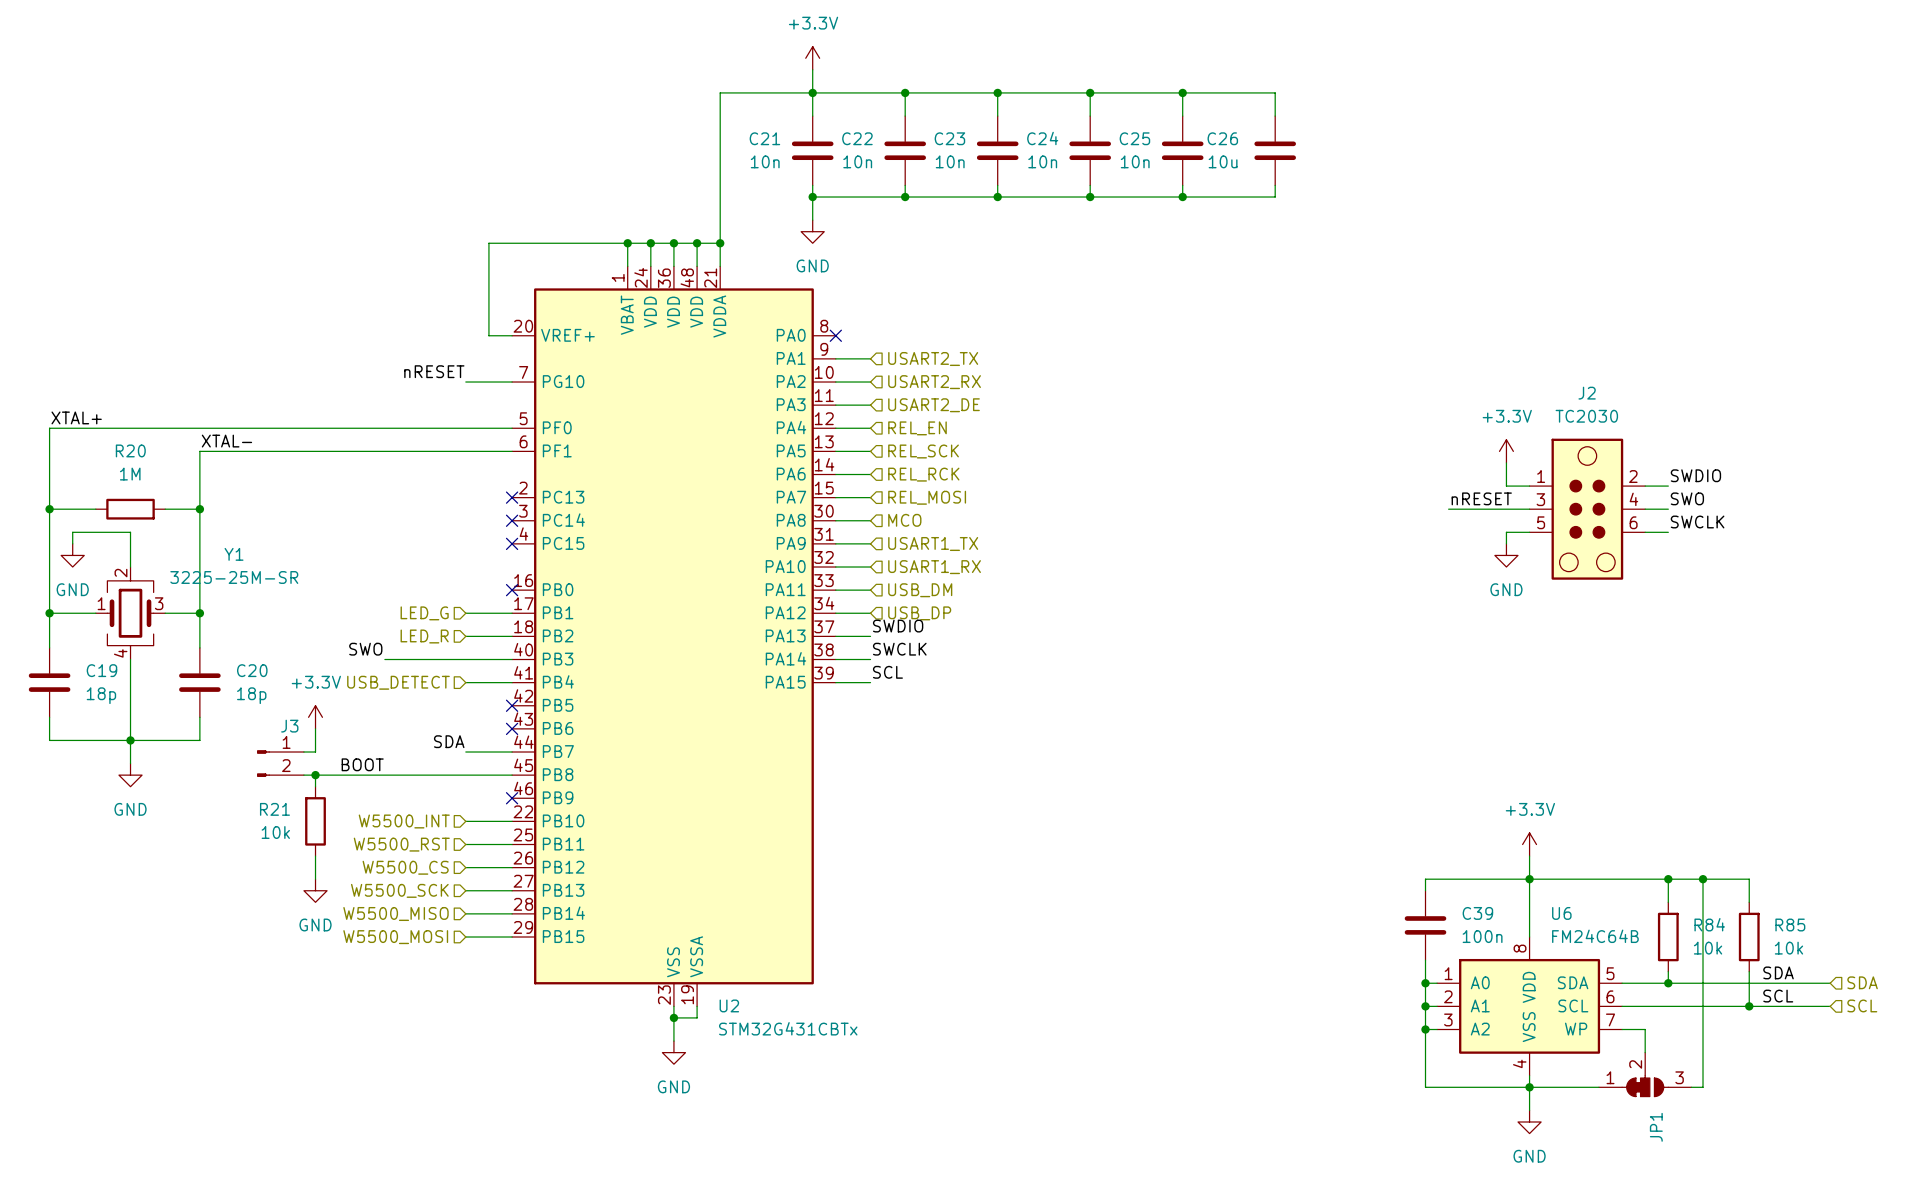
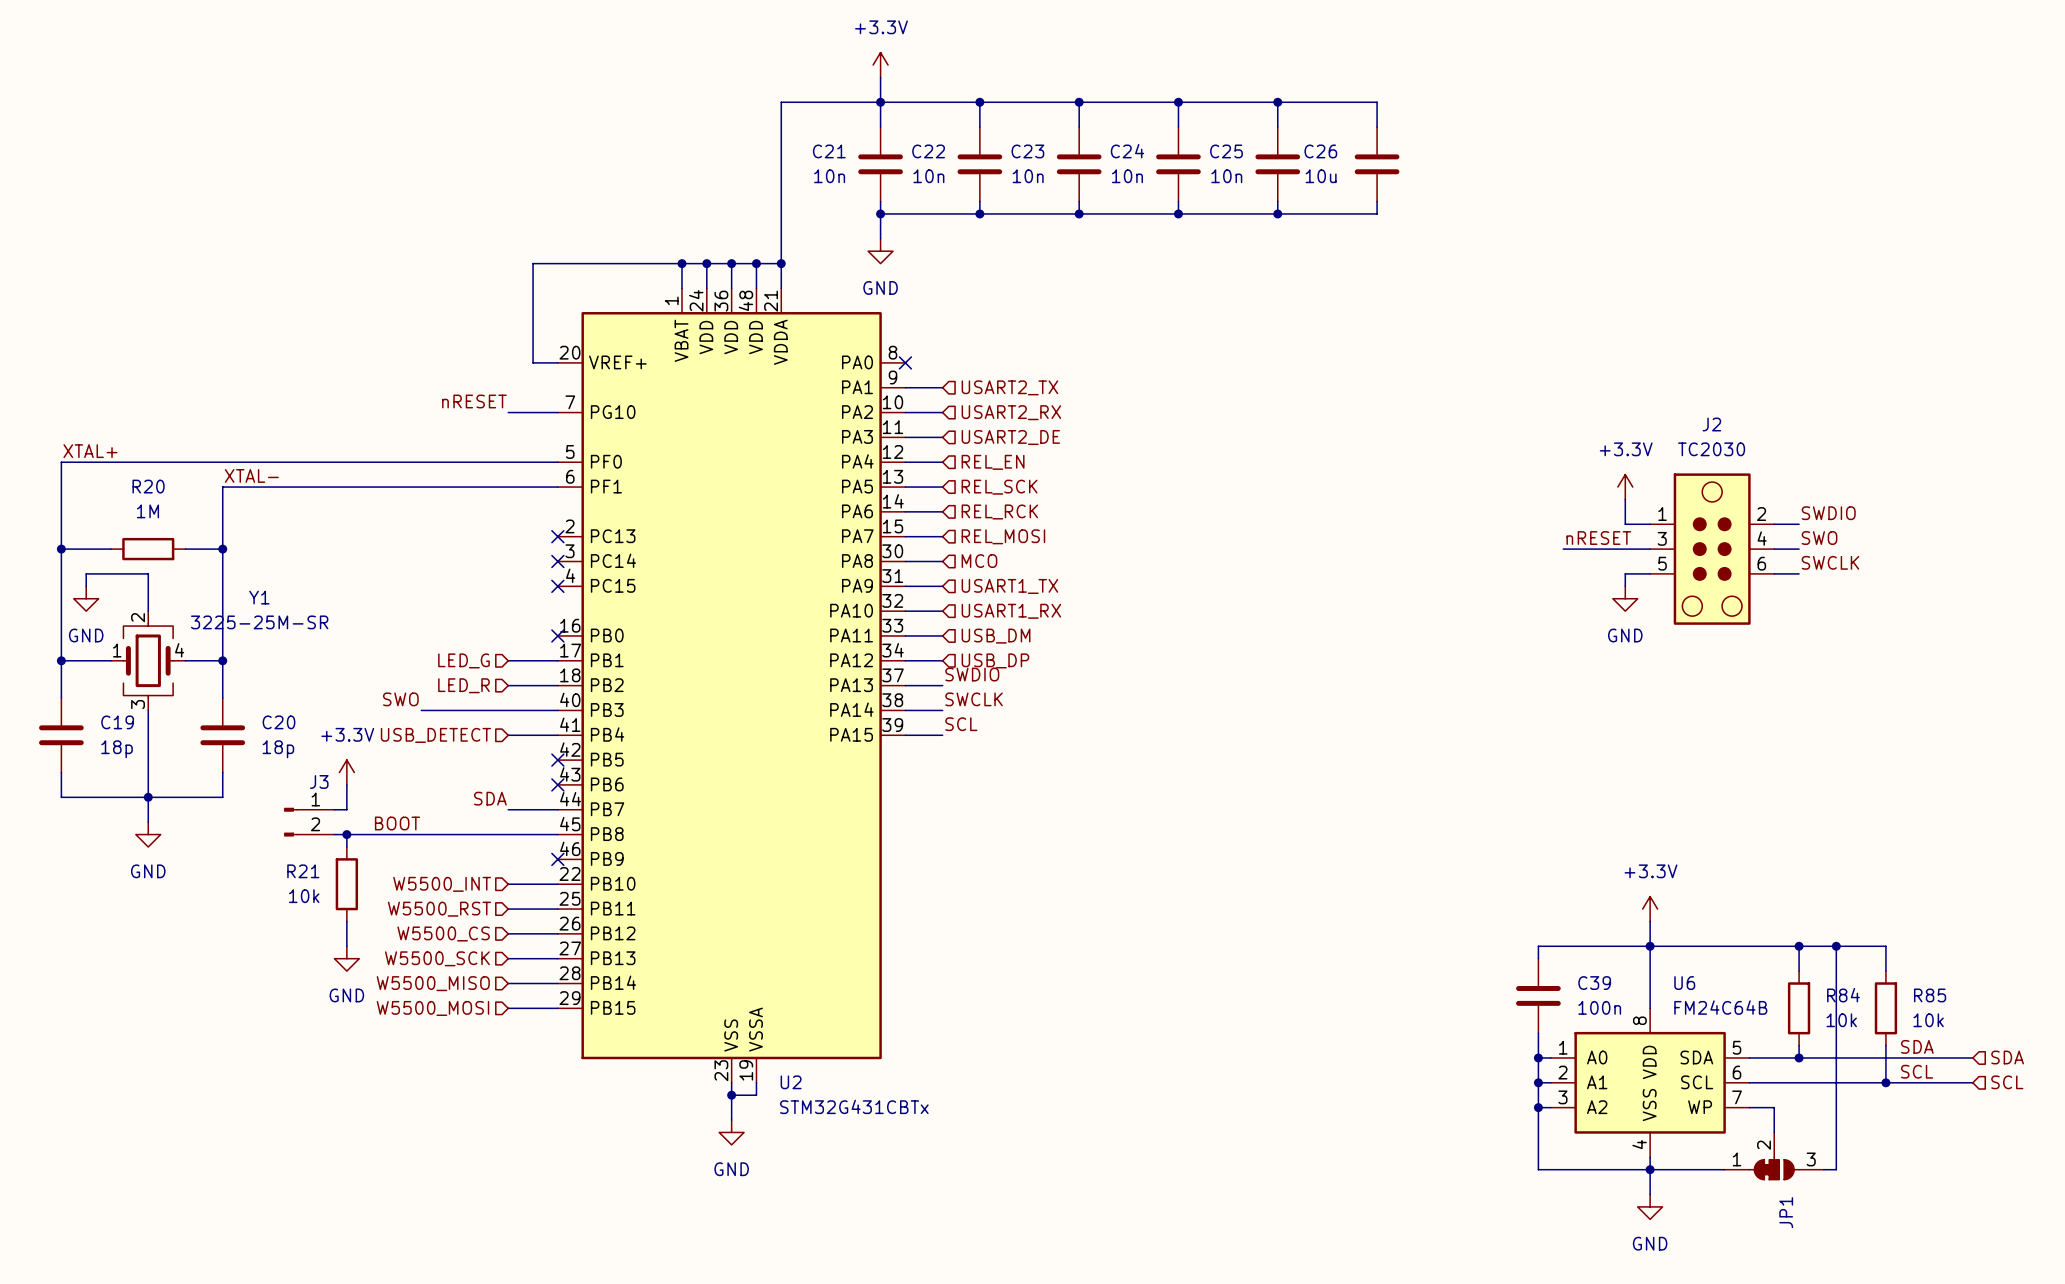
Y1 pin number: 3 (159, 603) -> 4 (179, 650)
Y1 pin number: 4 (120, 653) -> 3 (138, 704)

